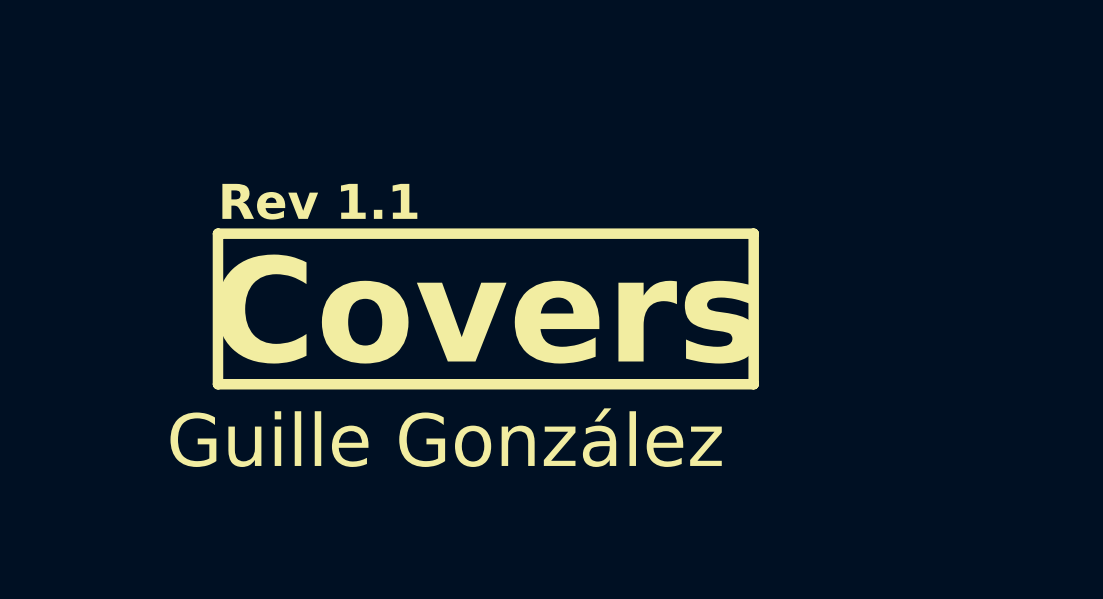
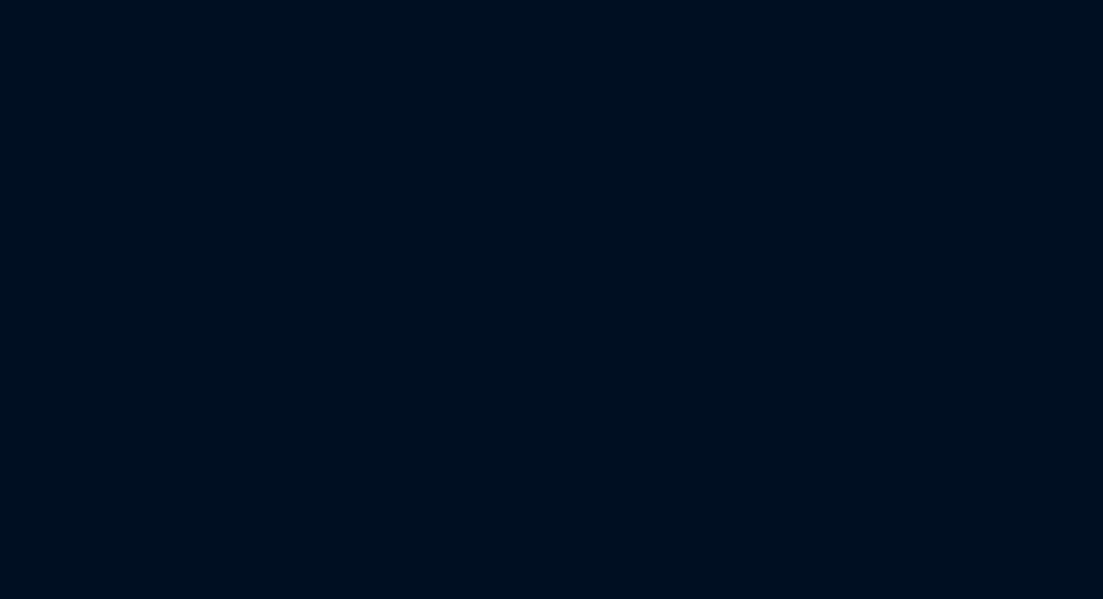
text: Rev 1.1 (319, 201) -> none
line: (753, 233) (217, 233) (217, 384) (753, 384) (753, 233) -> none
text: Covers (486, 309) -> none
text: Guille González (446, 437) -> none

